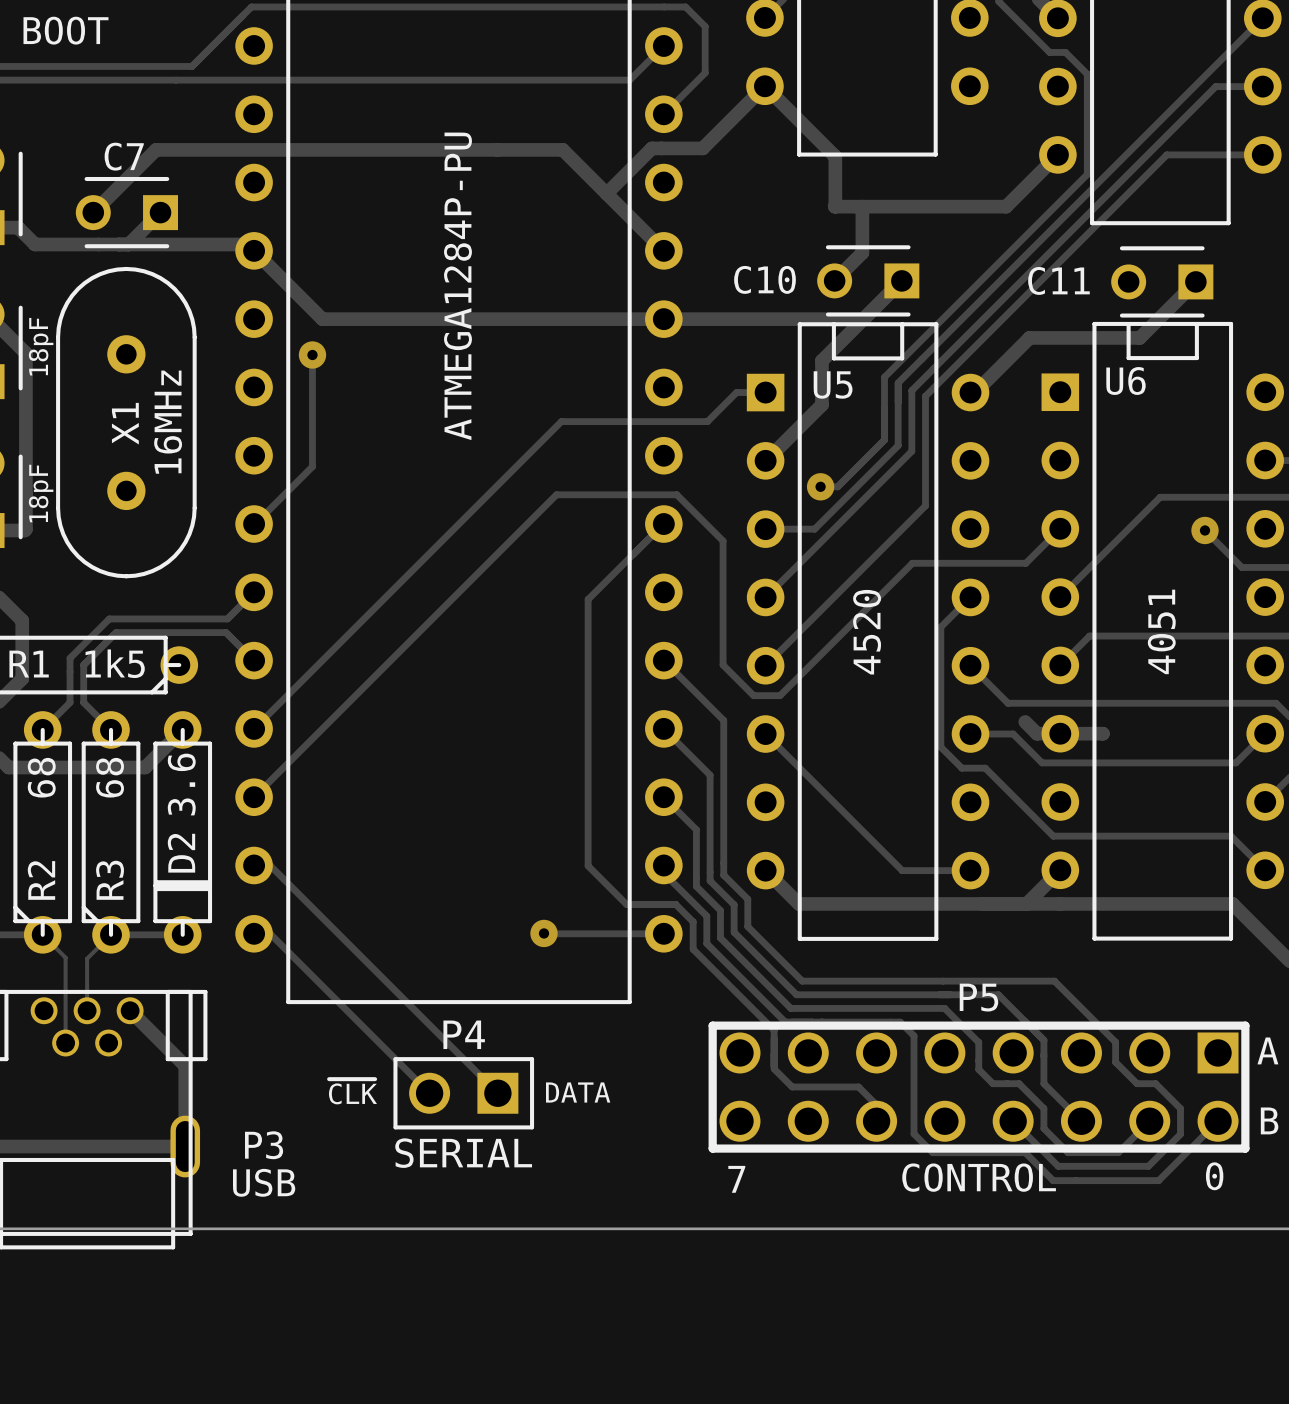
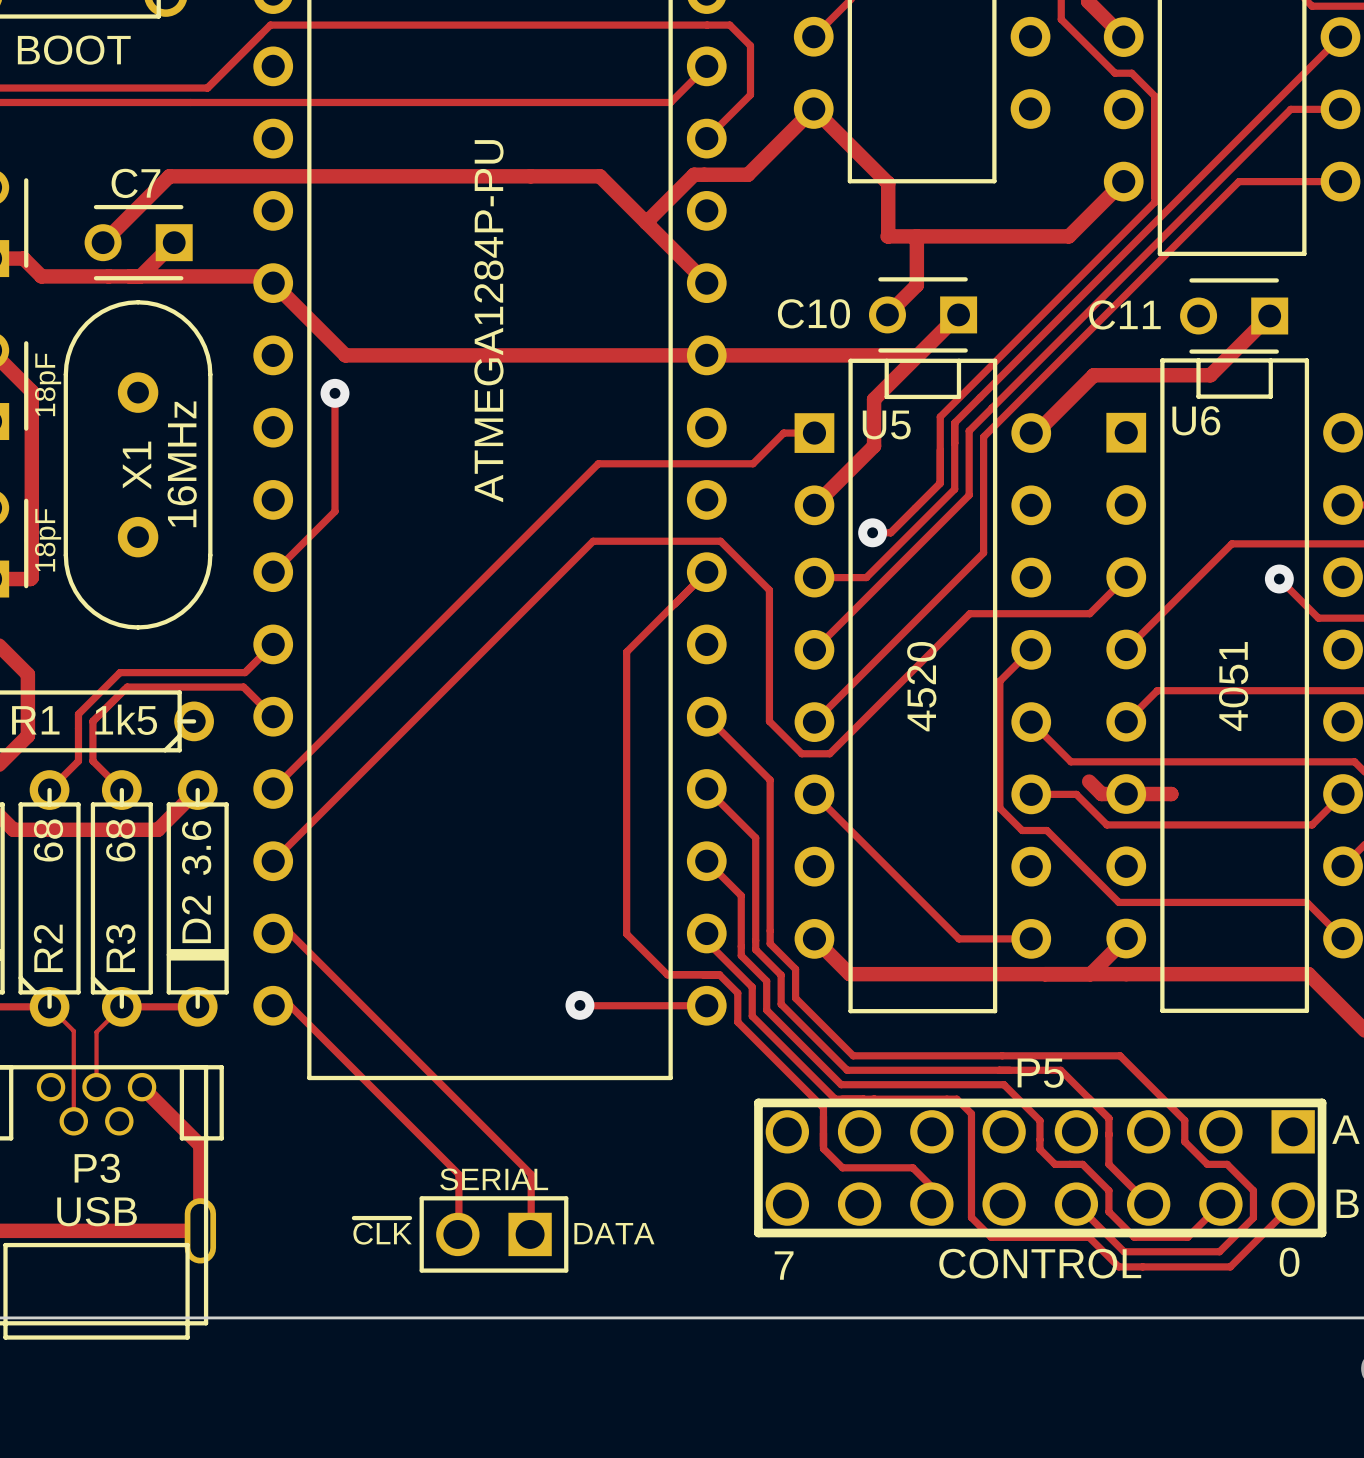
text position: ~{CLK} (352, 1091) -> ~{CLK} (382, 1231)
text position: DATA (578, 1092) -> DATA (614, 1233)
track: none -> (458, 1174) (457, 1234)
P4: SERIAL (463, 1093) -> none
track: none -> (531, 1174) (530, 1234)
P3 name position: P3 (264, 1145) -> P3 (97, 1168)
part: none -> SERIAL (493, 1234)
P3 value position: USB (264, 1182) -> USB (97, 1211)

